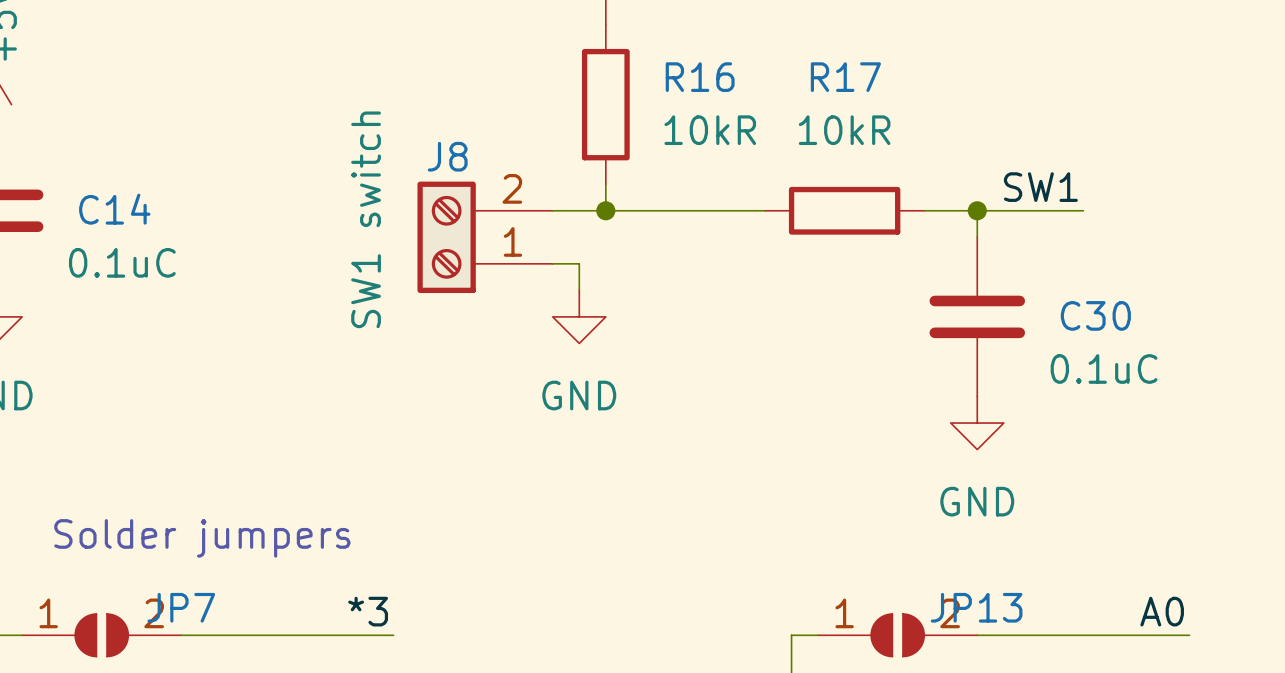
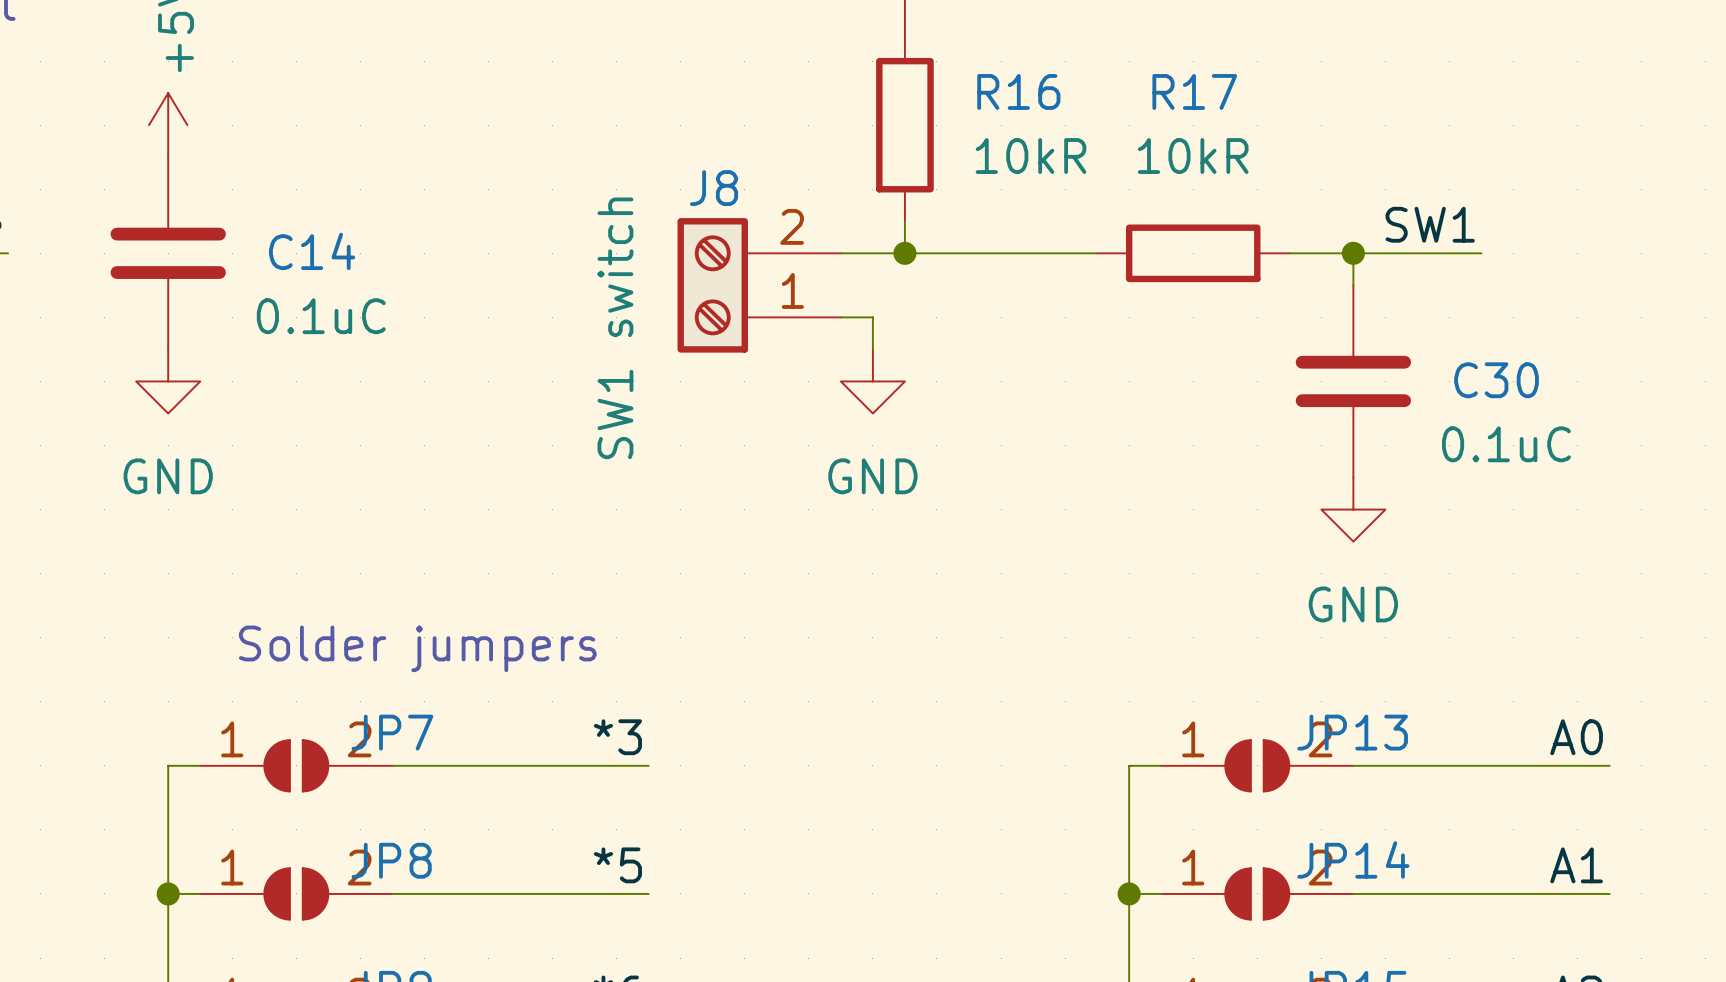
J8 value position: SW1 switch (366, 219) -> SW1 switch (615, 328)

